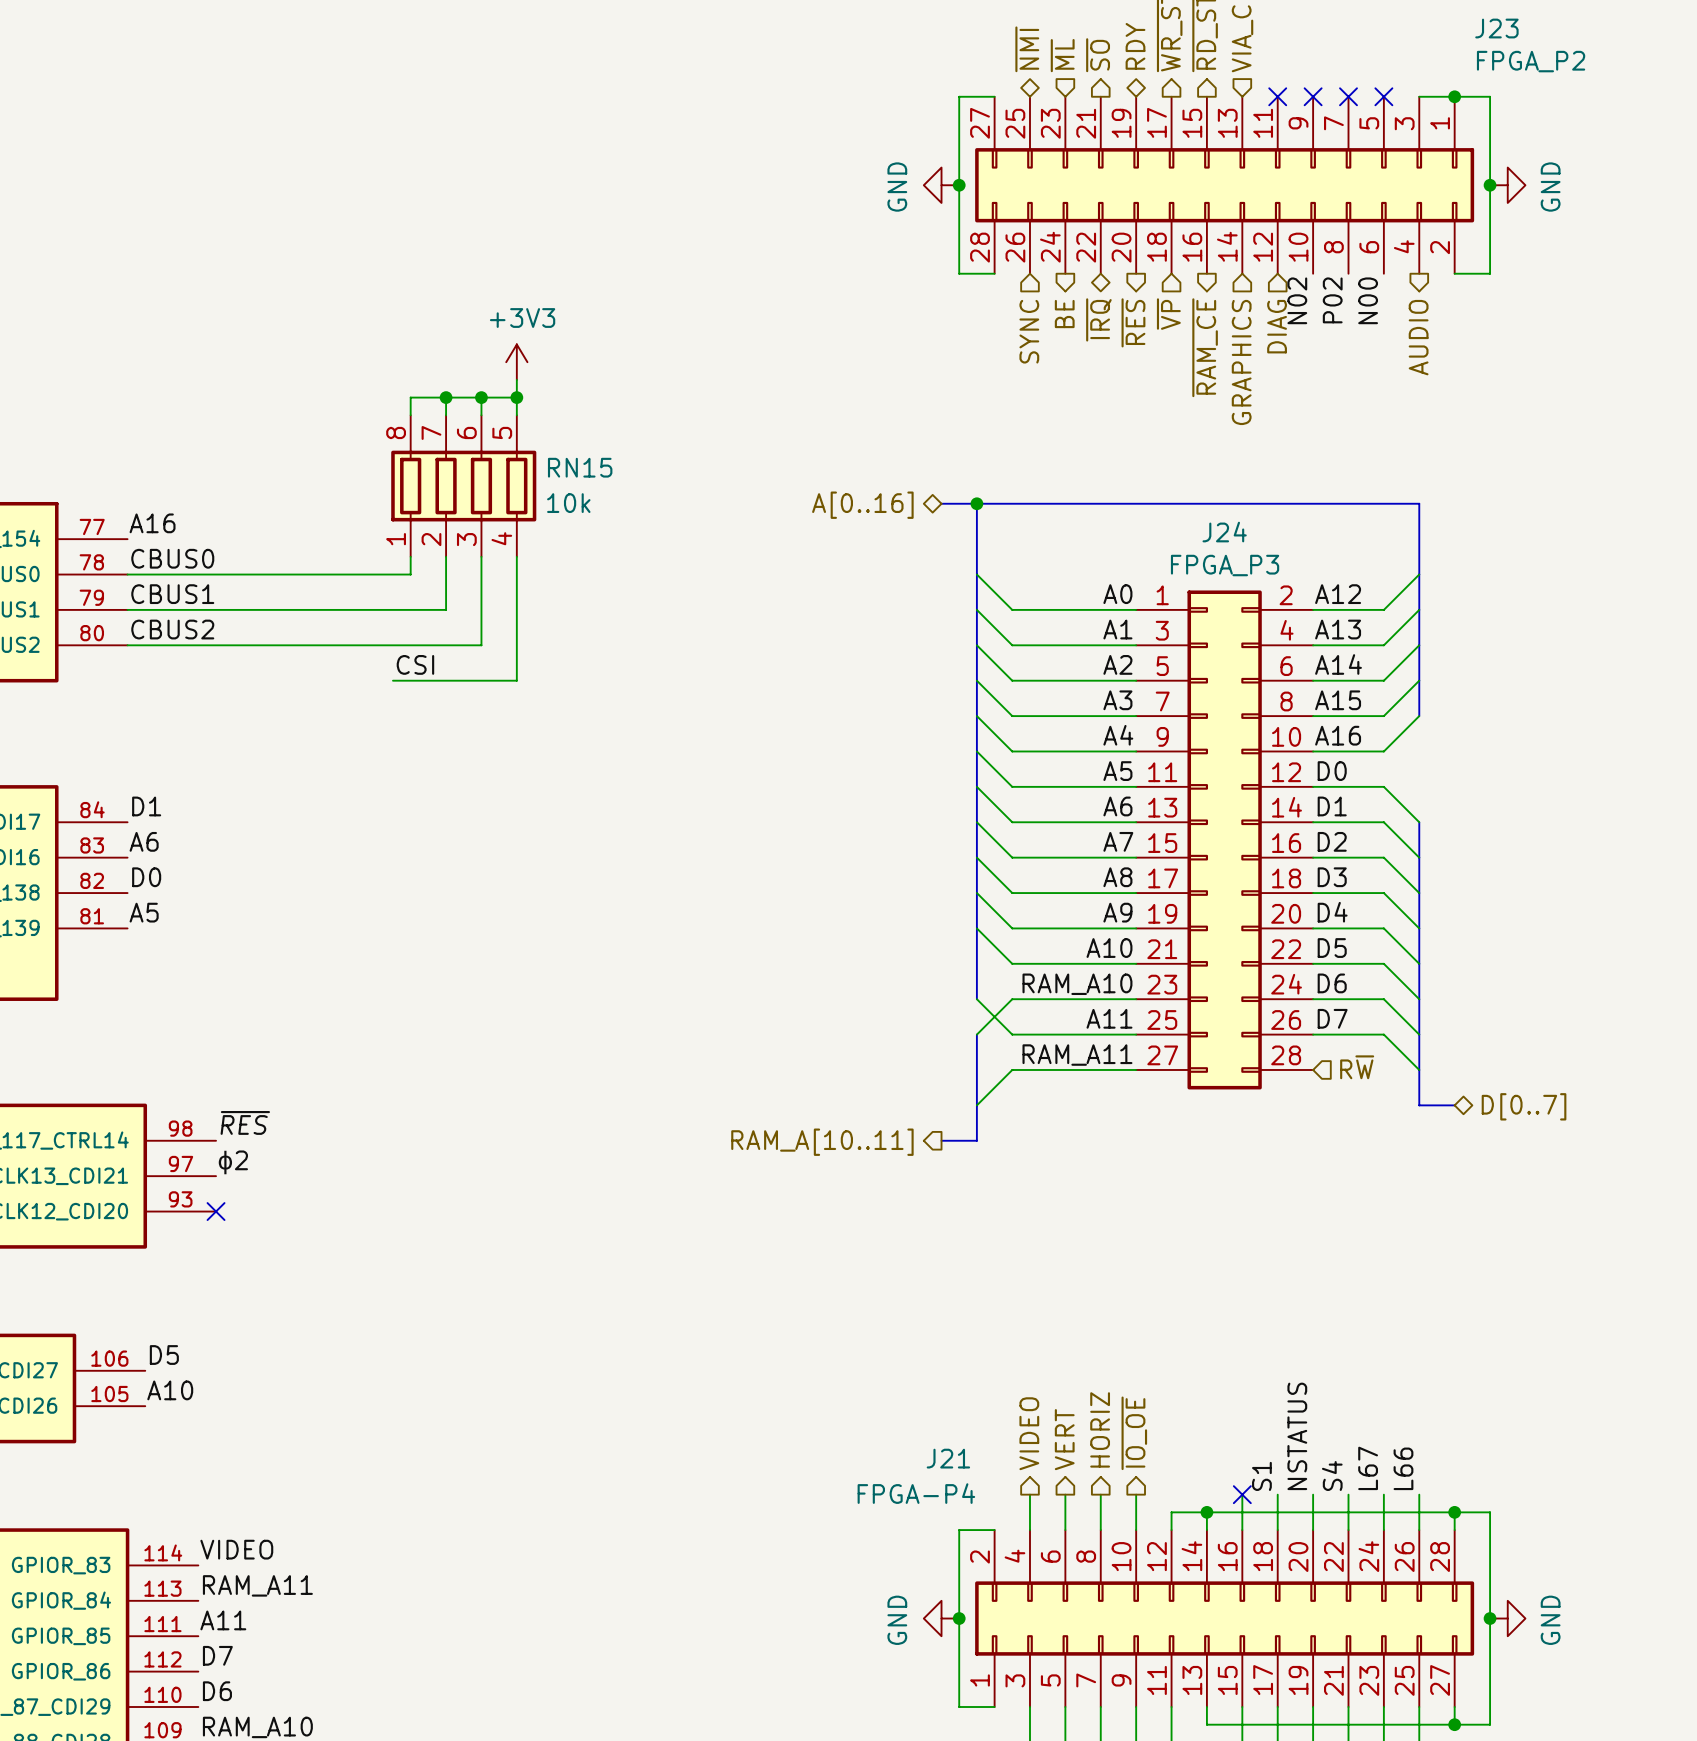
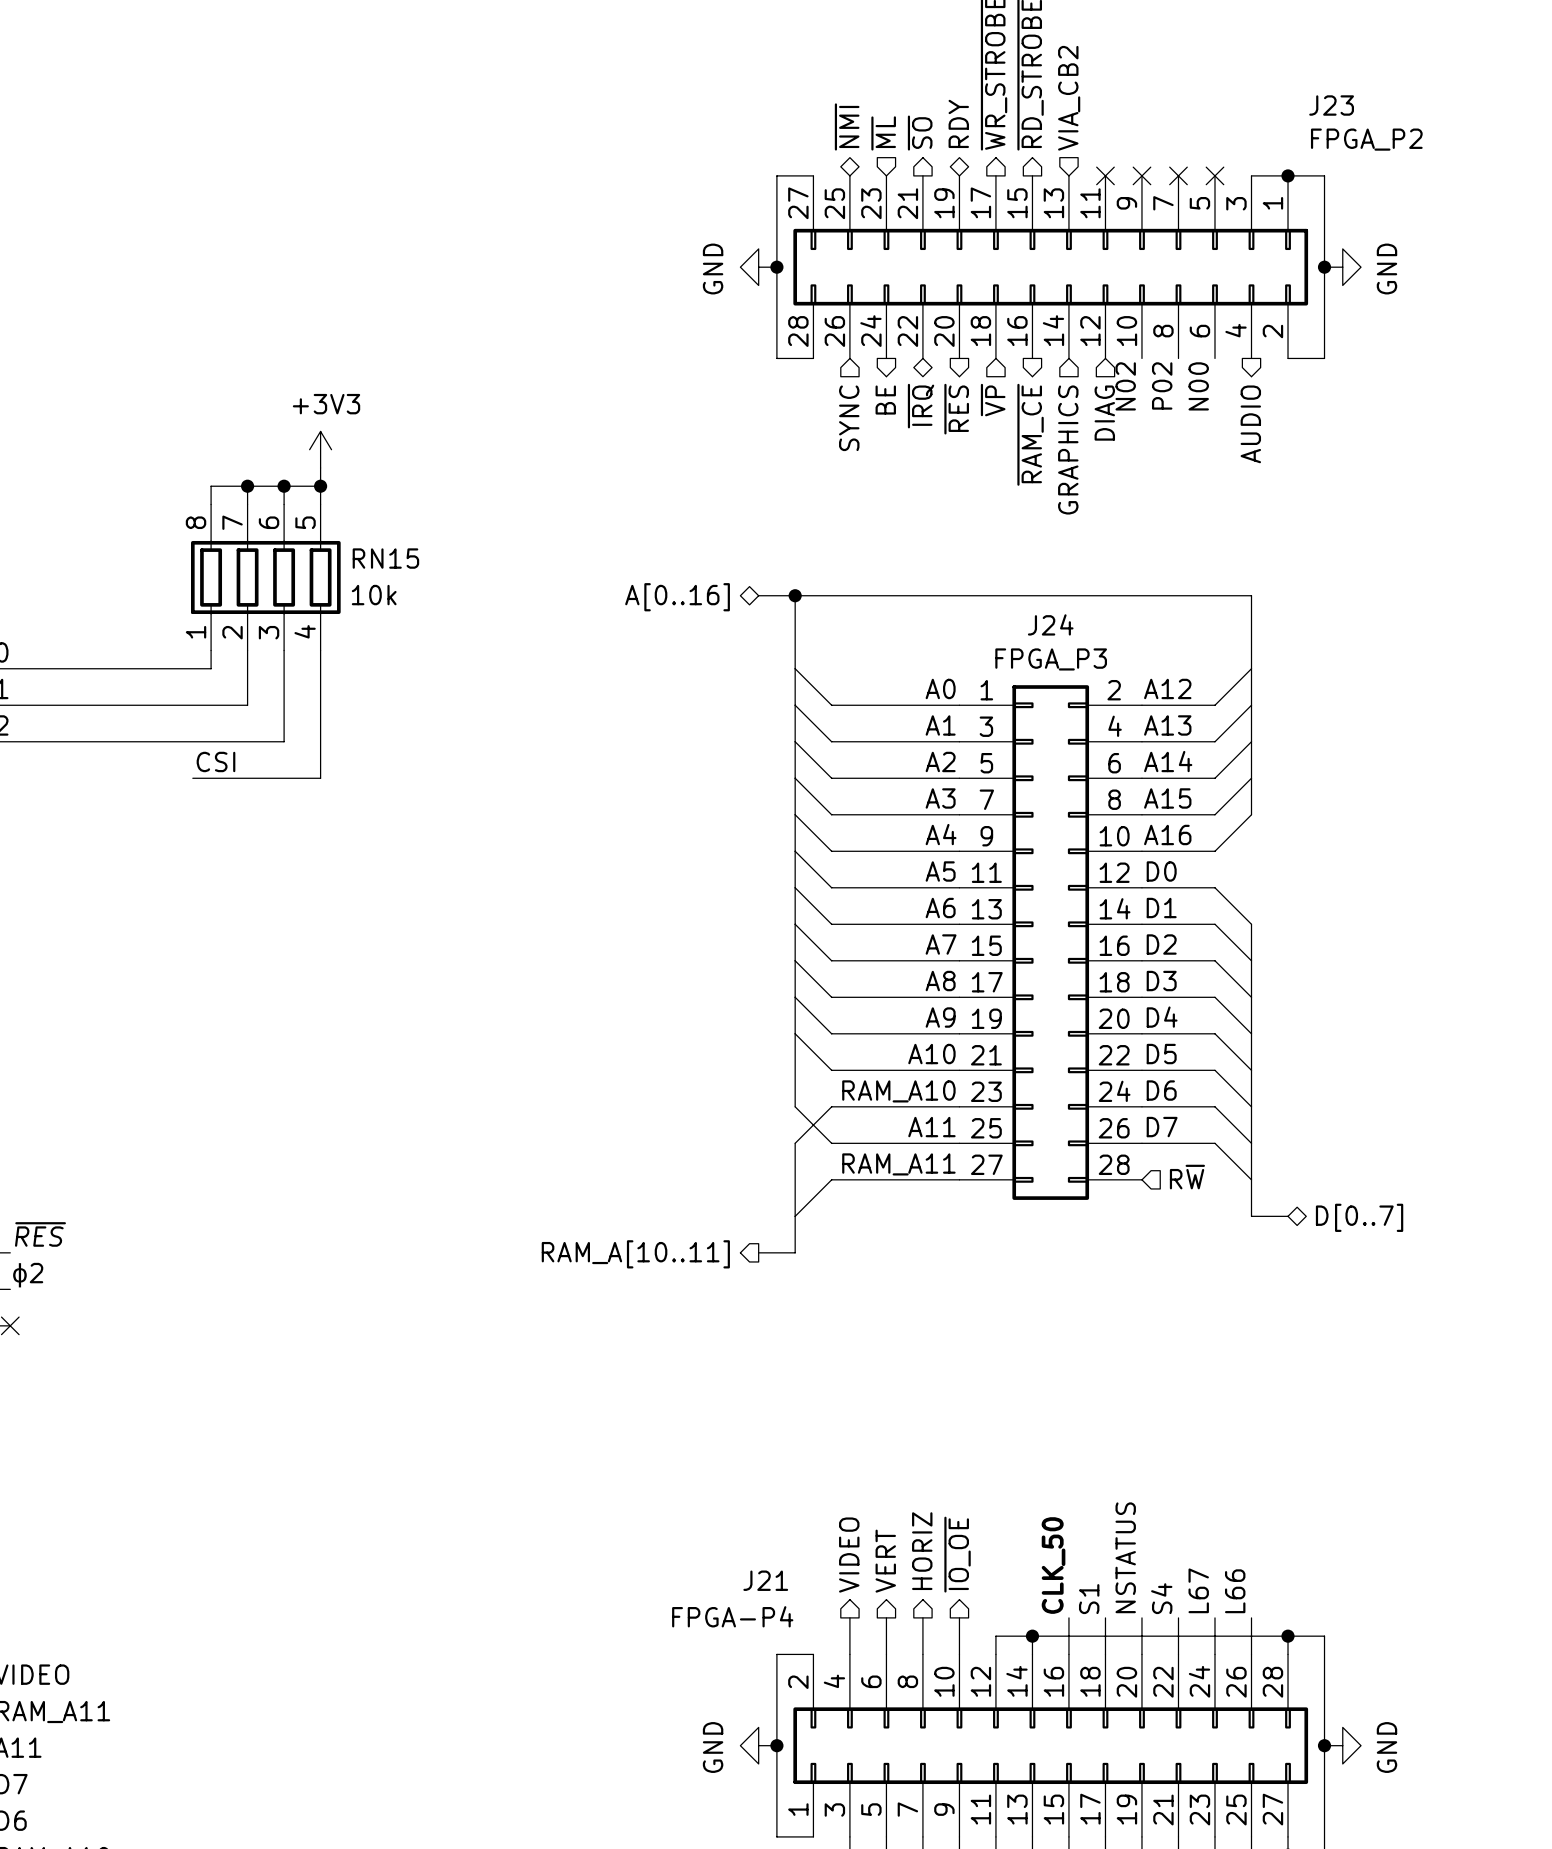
label: none -> CLK_50 (1053, 1565)
no-connect mark: (1242, 1494) -> none

